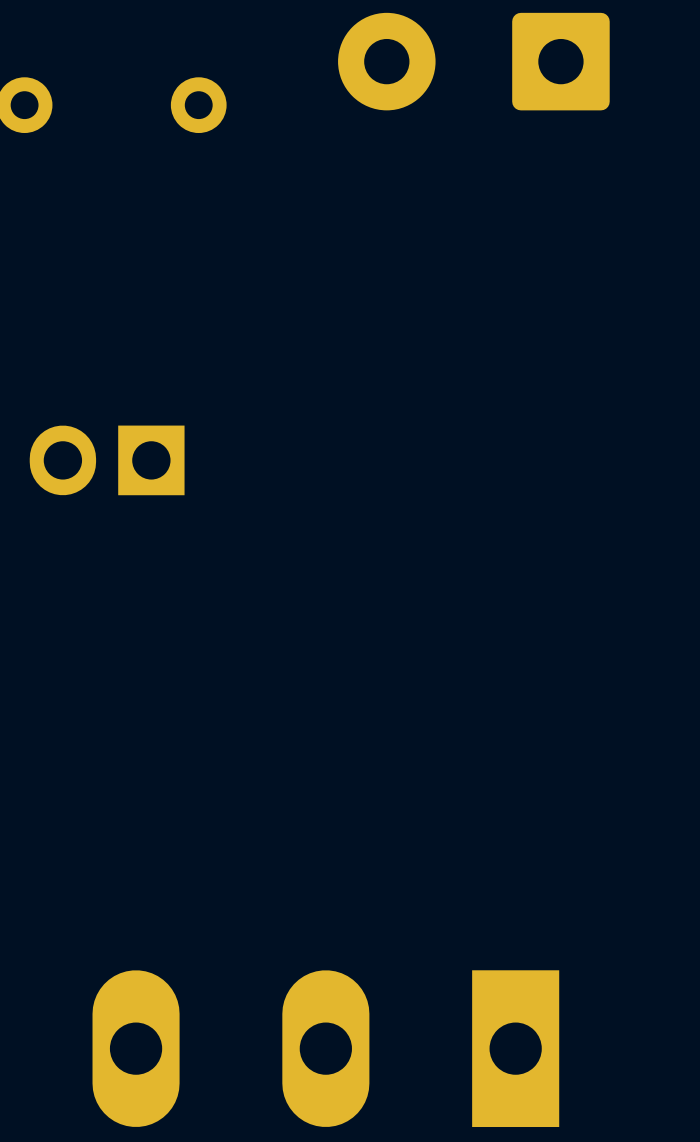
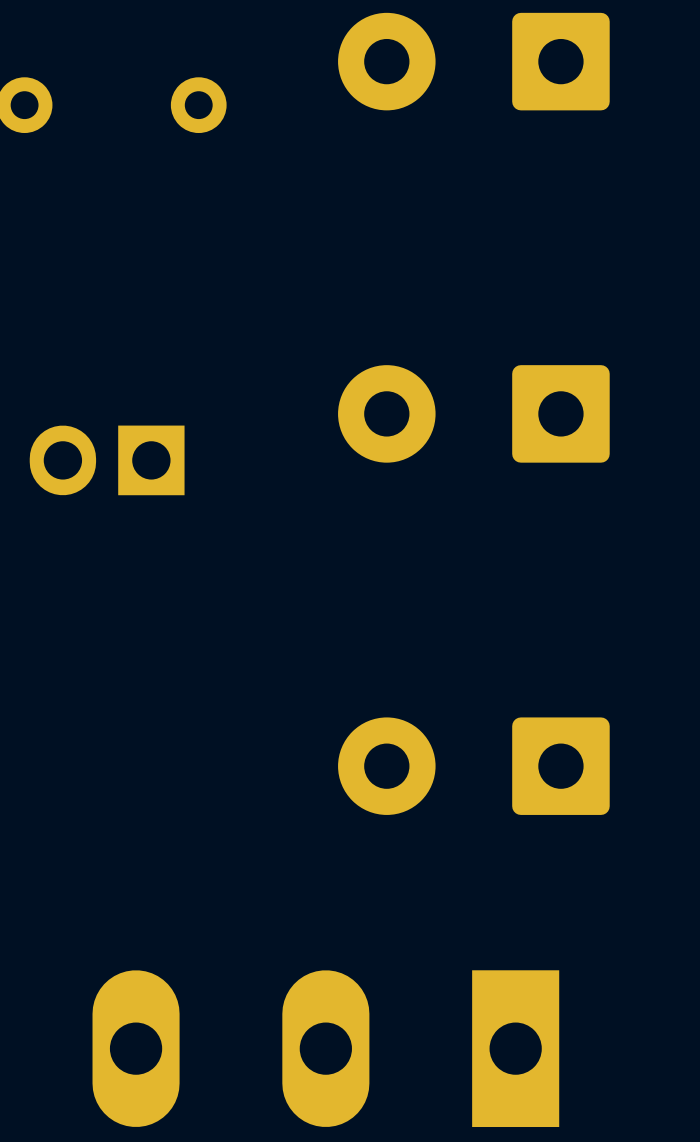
part: none -> (473, 413)
part: none -> (473, 766)

